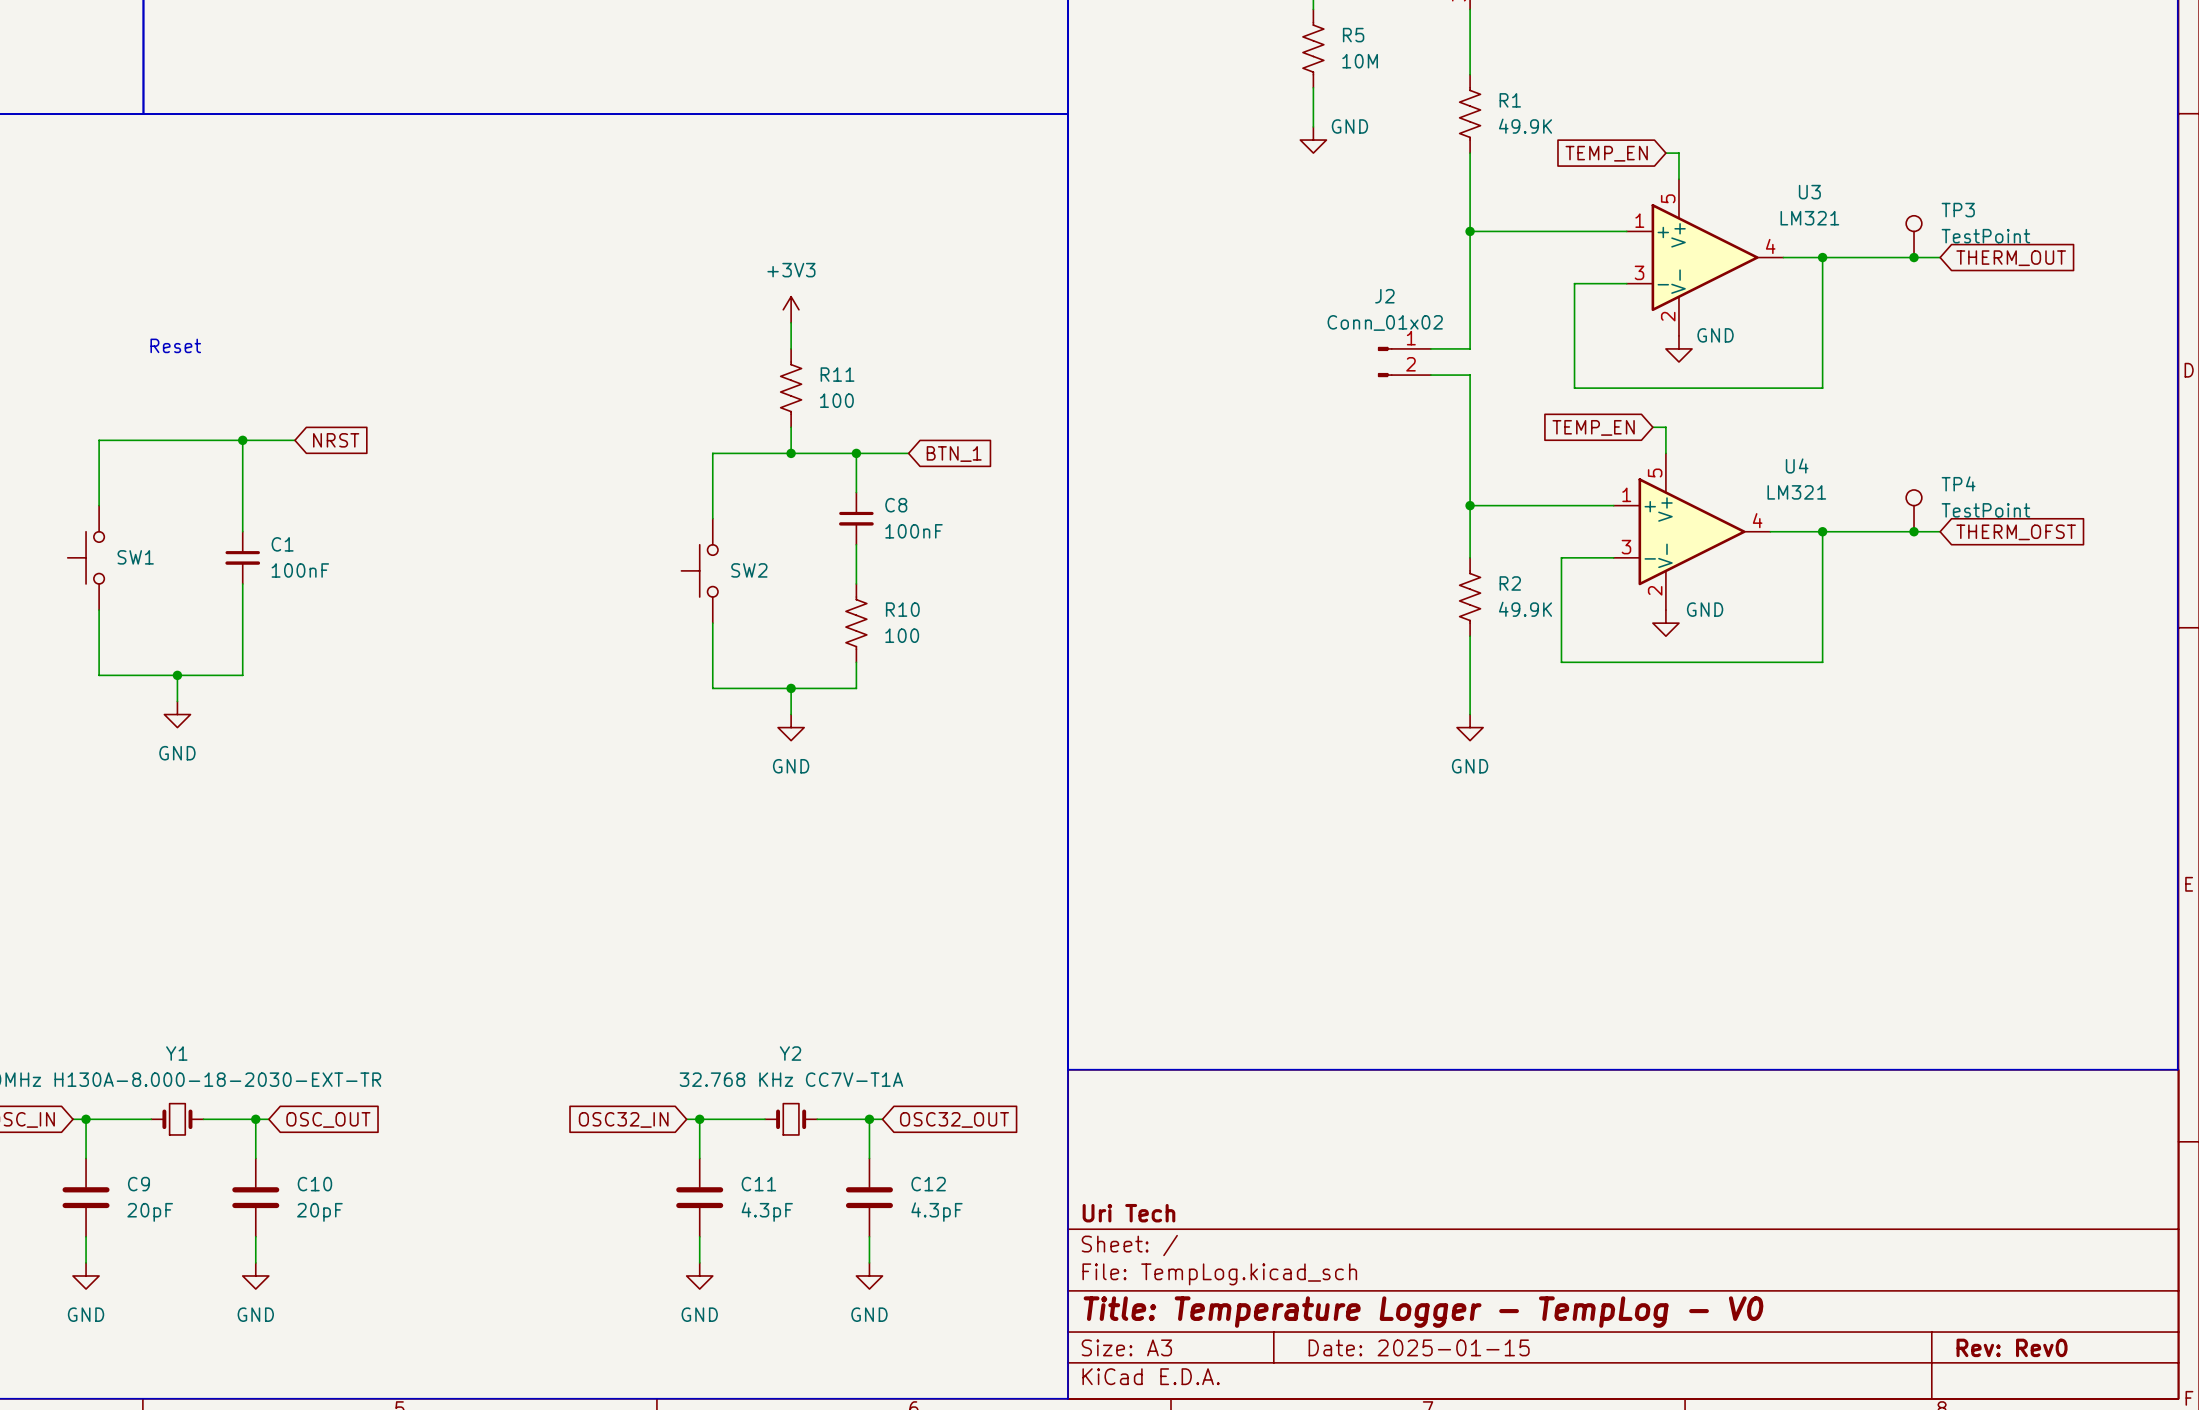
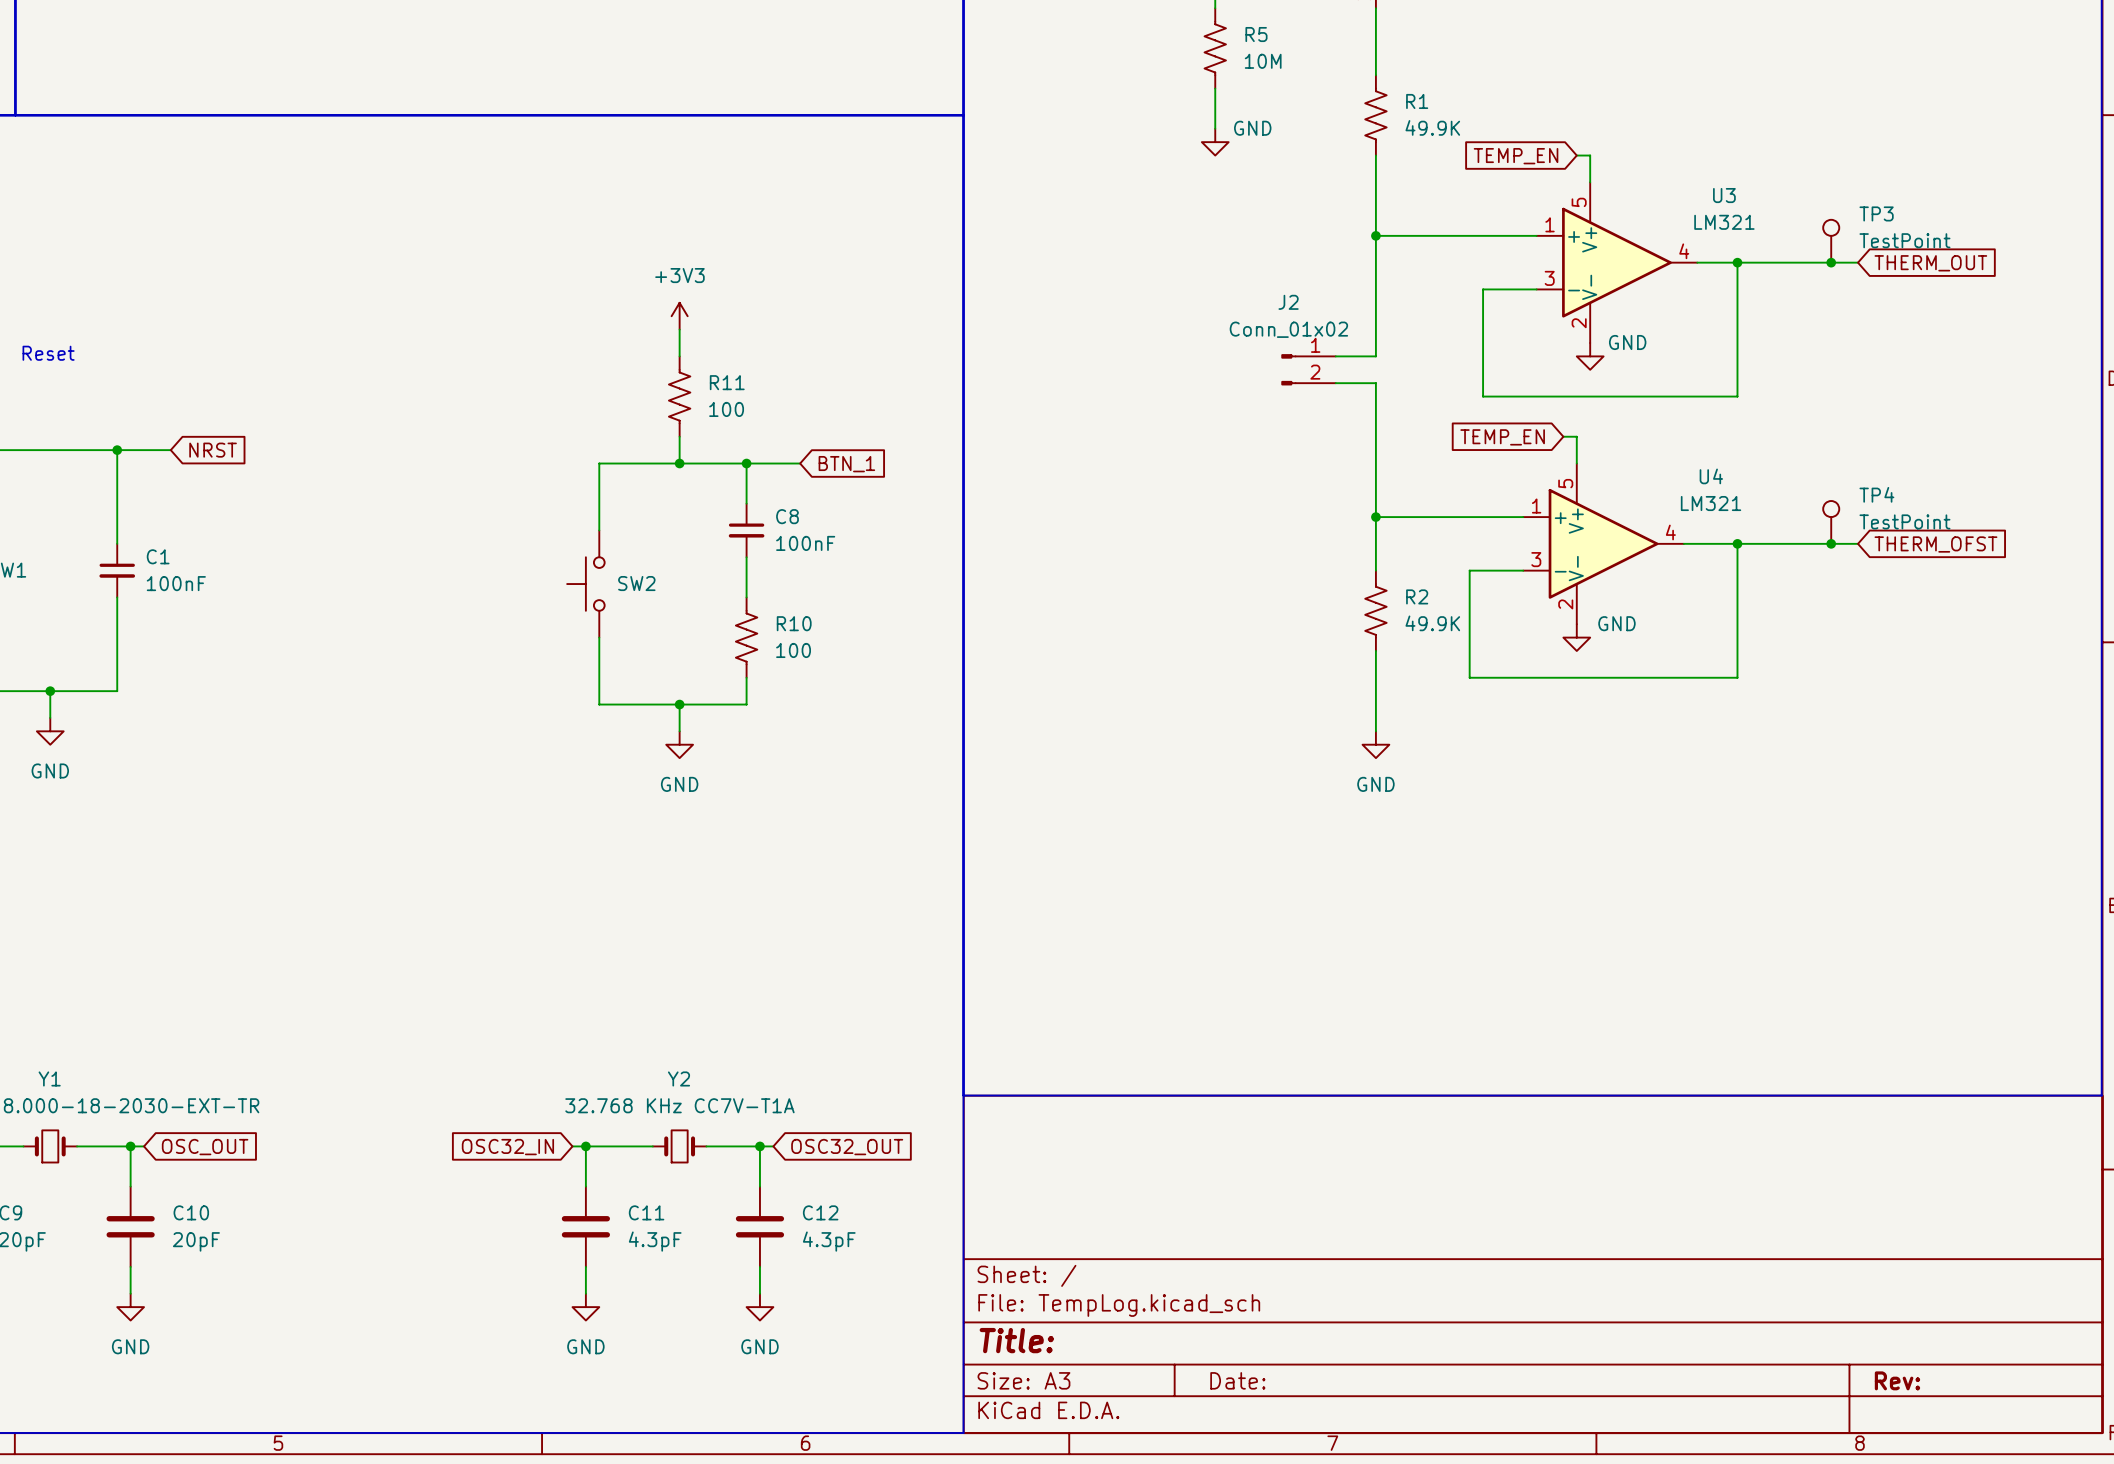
title block: Uri Tech (1128, 1213) -> none
title block: Title: Temperature Logger - TempLog - V0 (1423, 1312) -> Title: (1016, 1340)
title block: Date: 2025-01-15 (1419, 1347) -> Date: (1237, 1380)
title block: Rev: Rev0 (2012, 1347) -> Rev: (1897, 1380)

